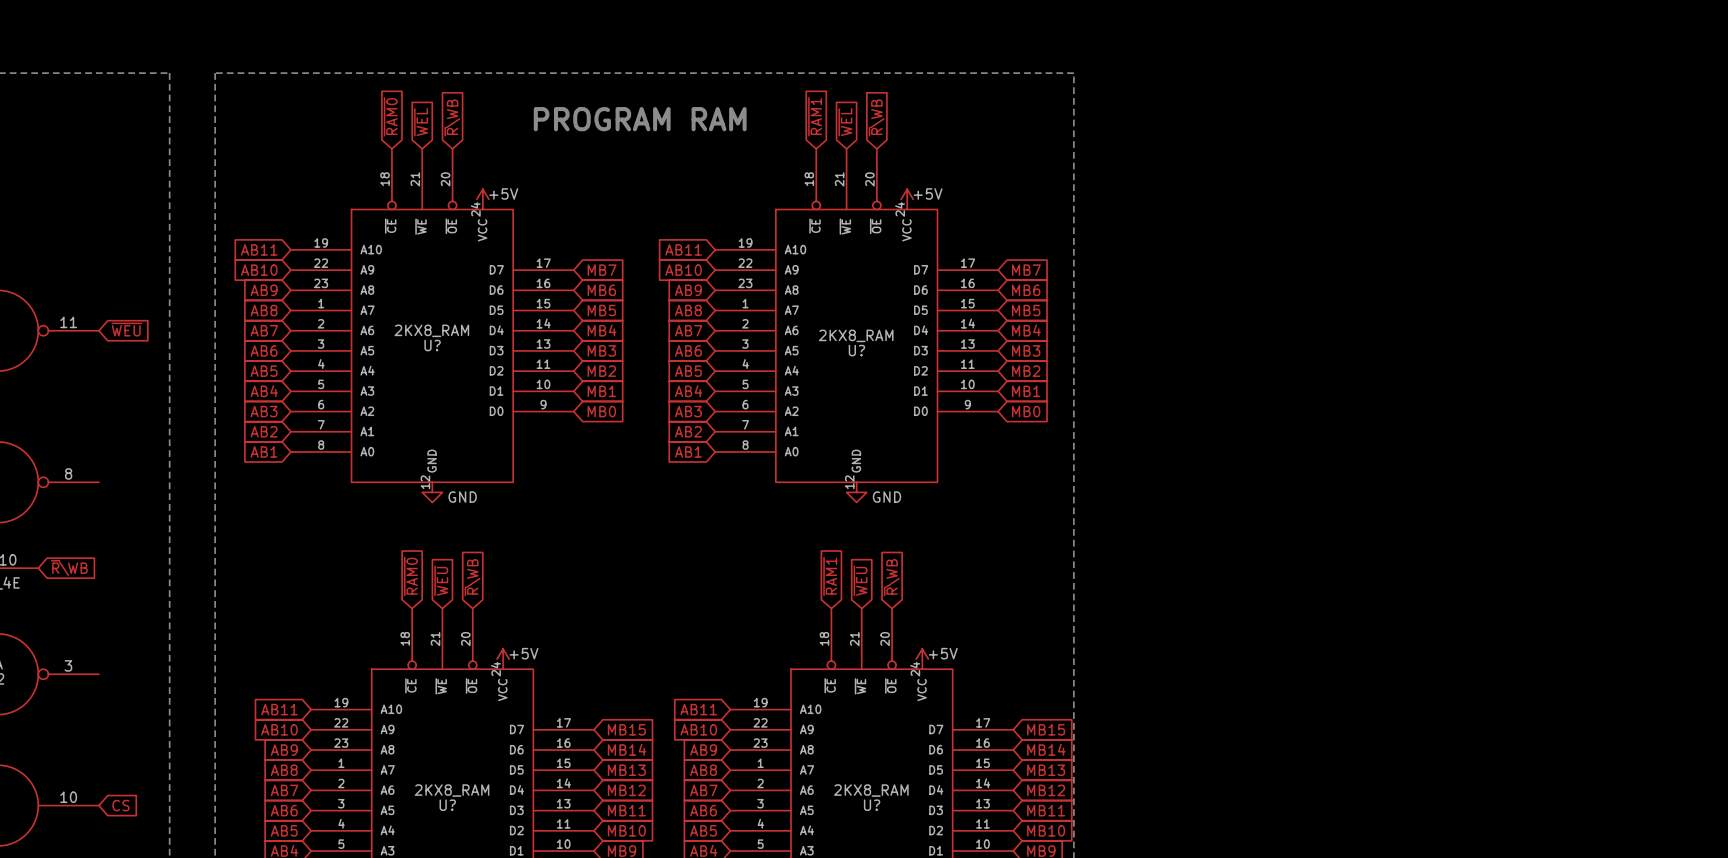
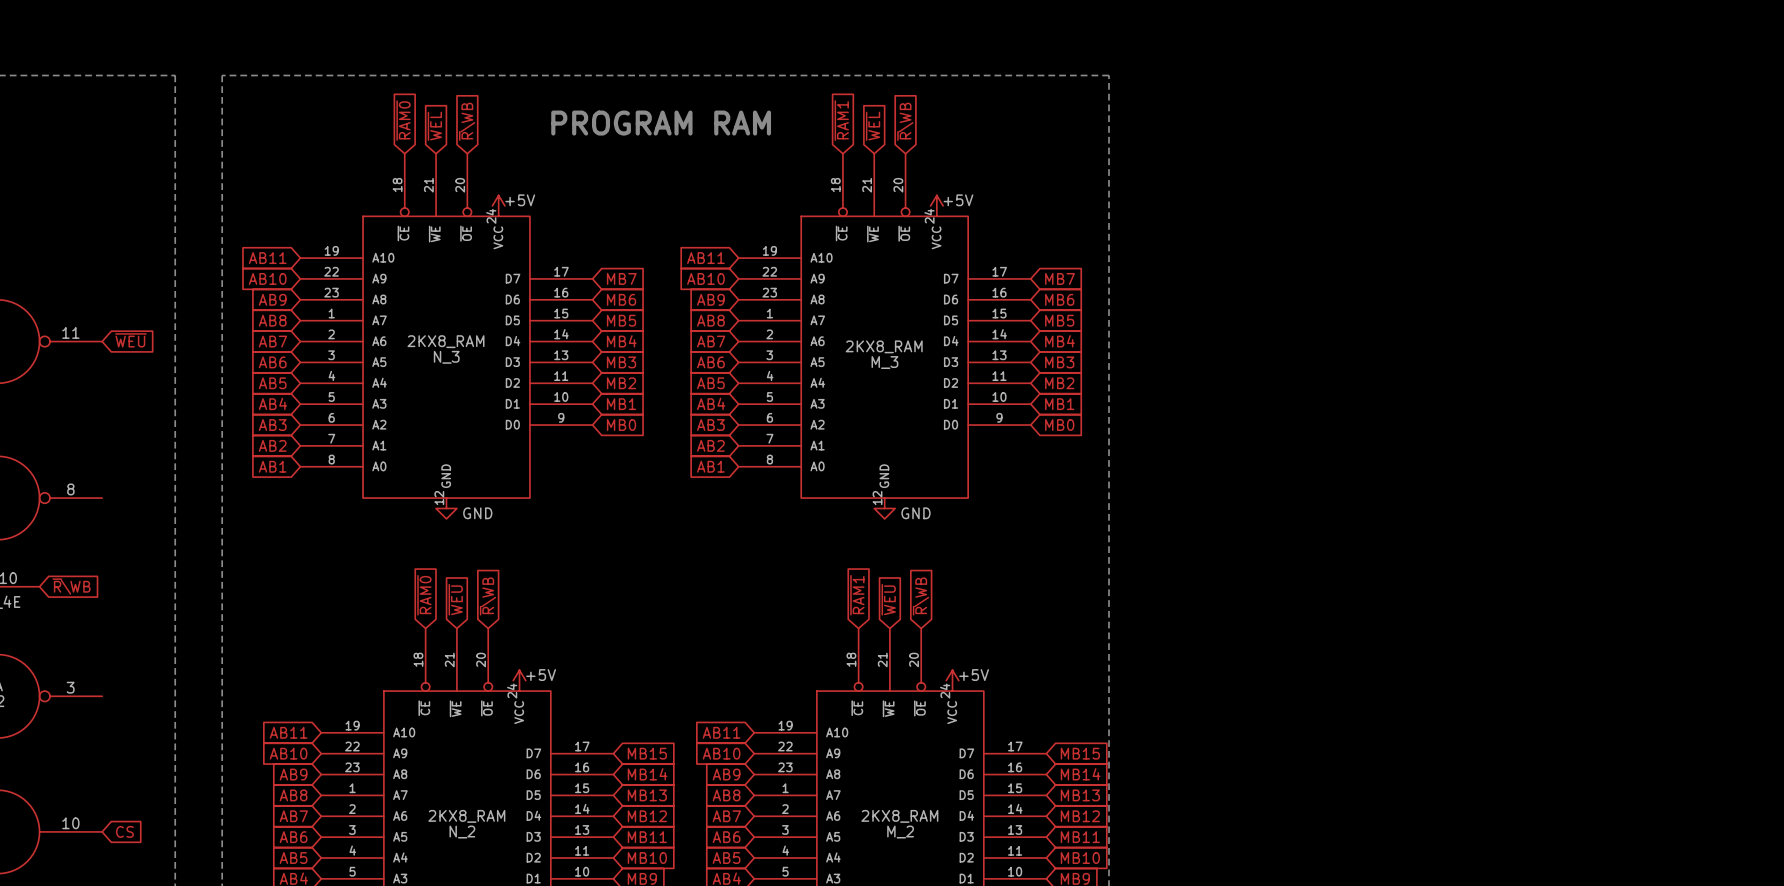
U? name: U? (432, 345) -> N_3 (446, 357)
U? name: U? (856, 350) -> M_3 (884, 362)
U? name: U? (447, 805) -> N_2 (462, 832)
U? name: U? (872, 805) -> M_2 (900, 832)

